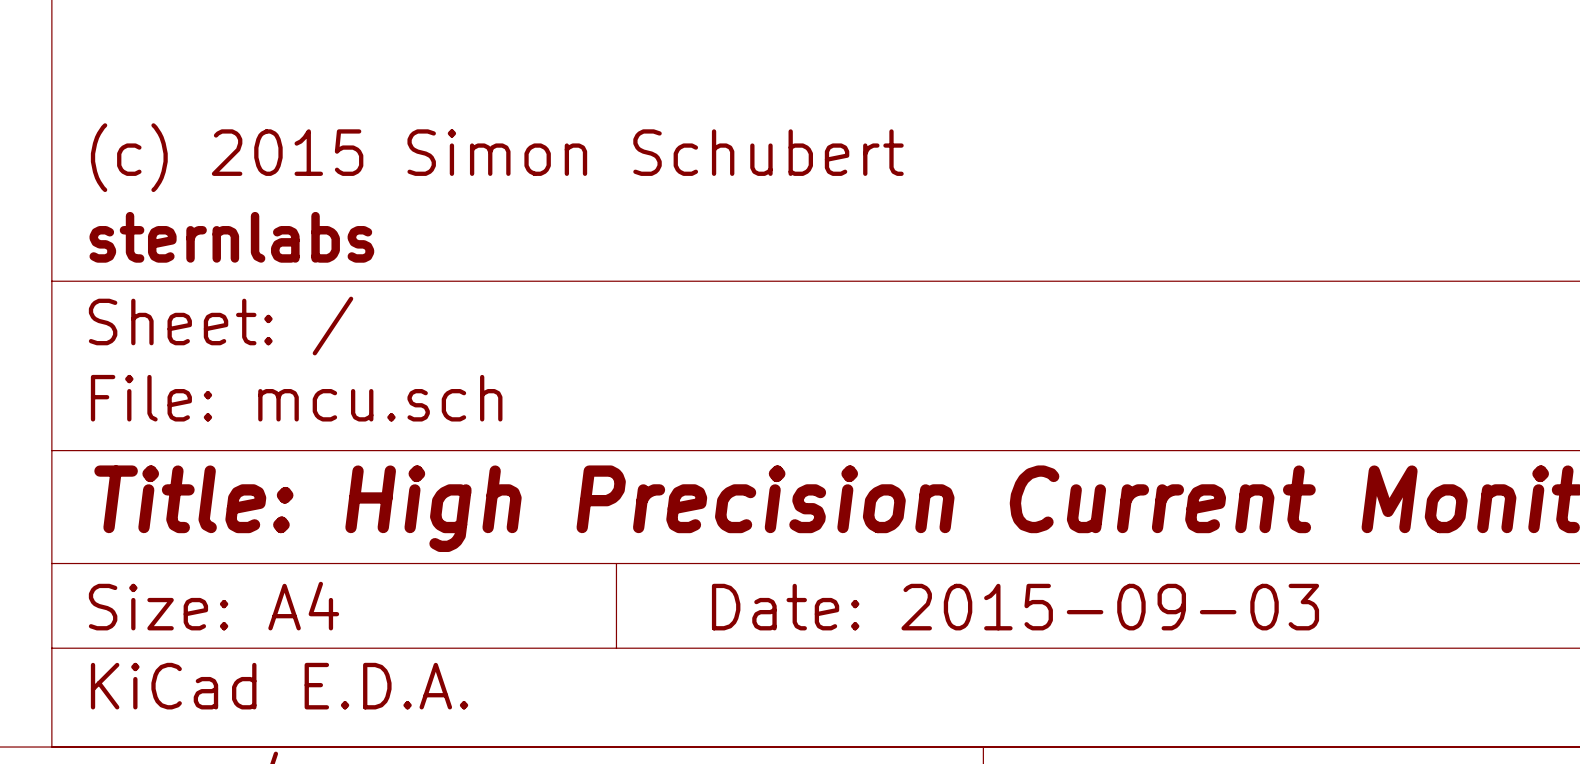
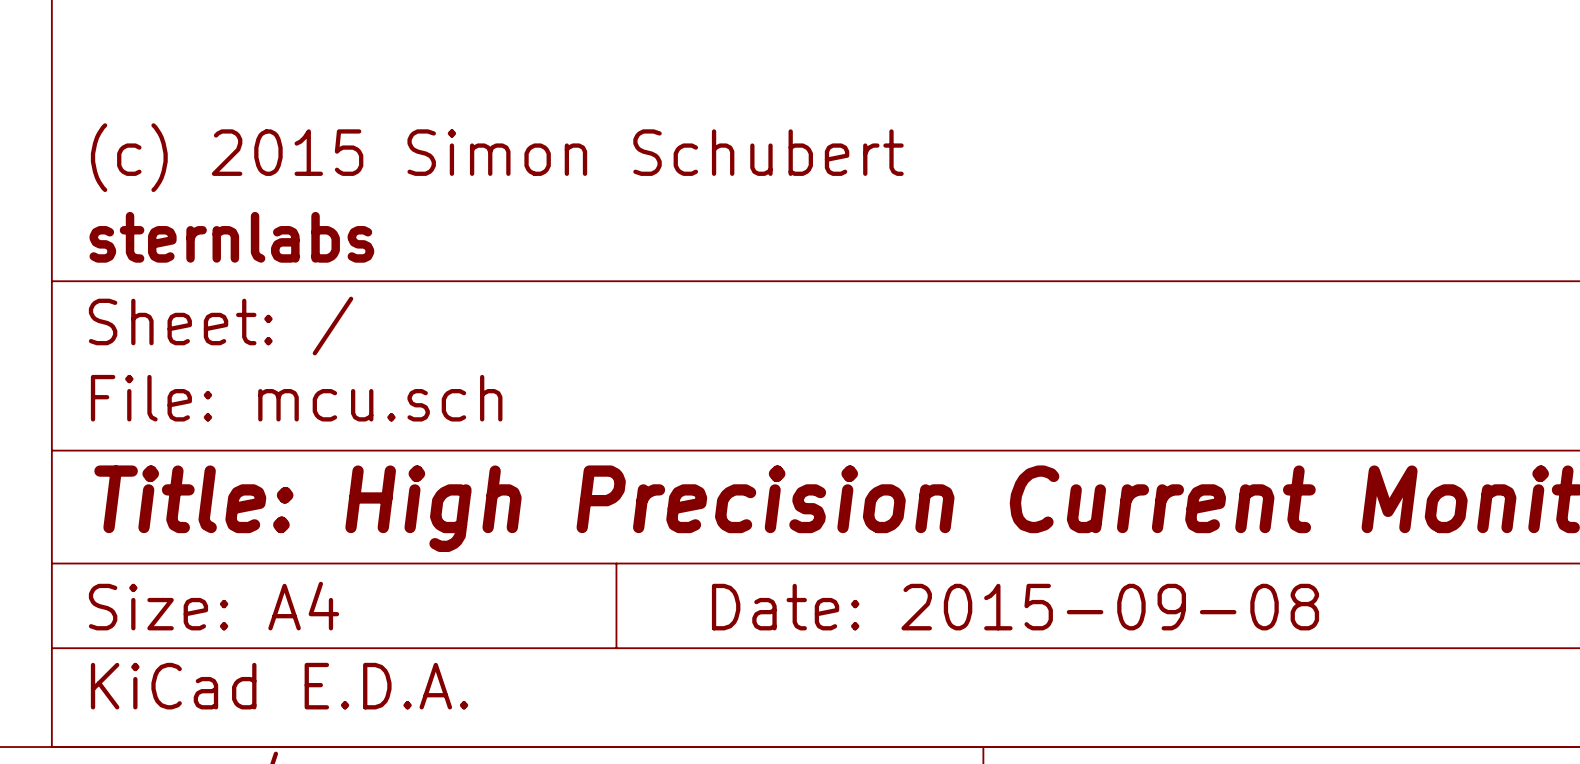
title block: Date: 2015-09-03 (1015, 607) -> Date: 2015-09-08 (1015, 607)

